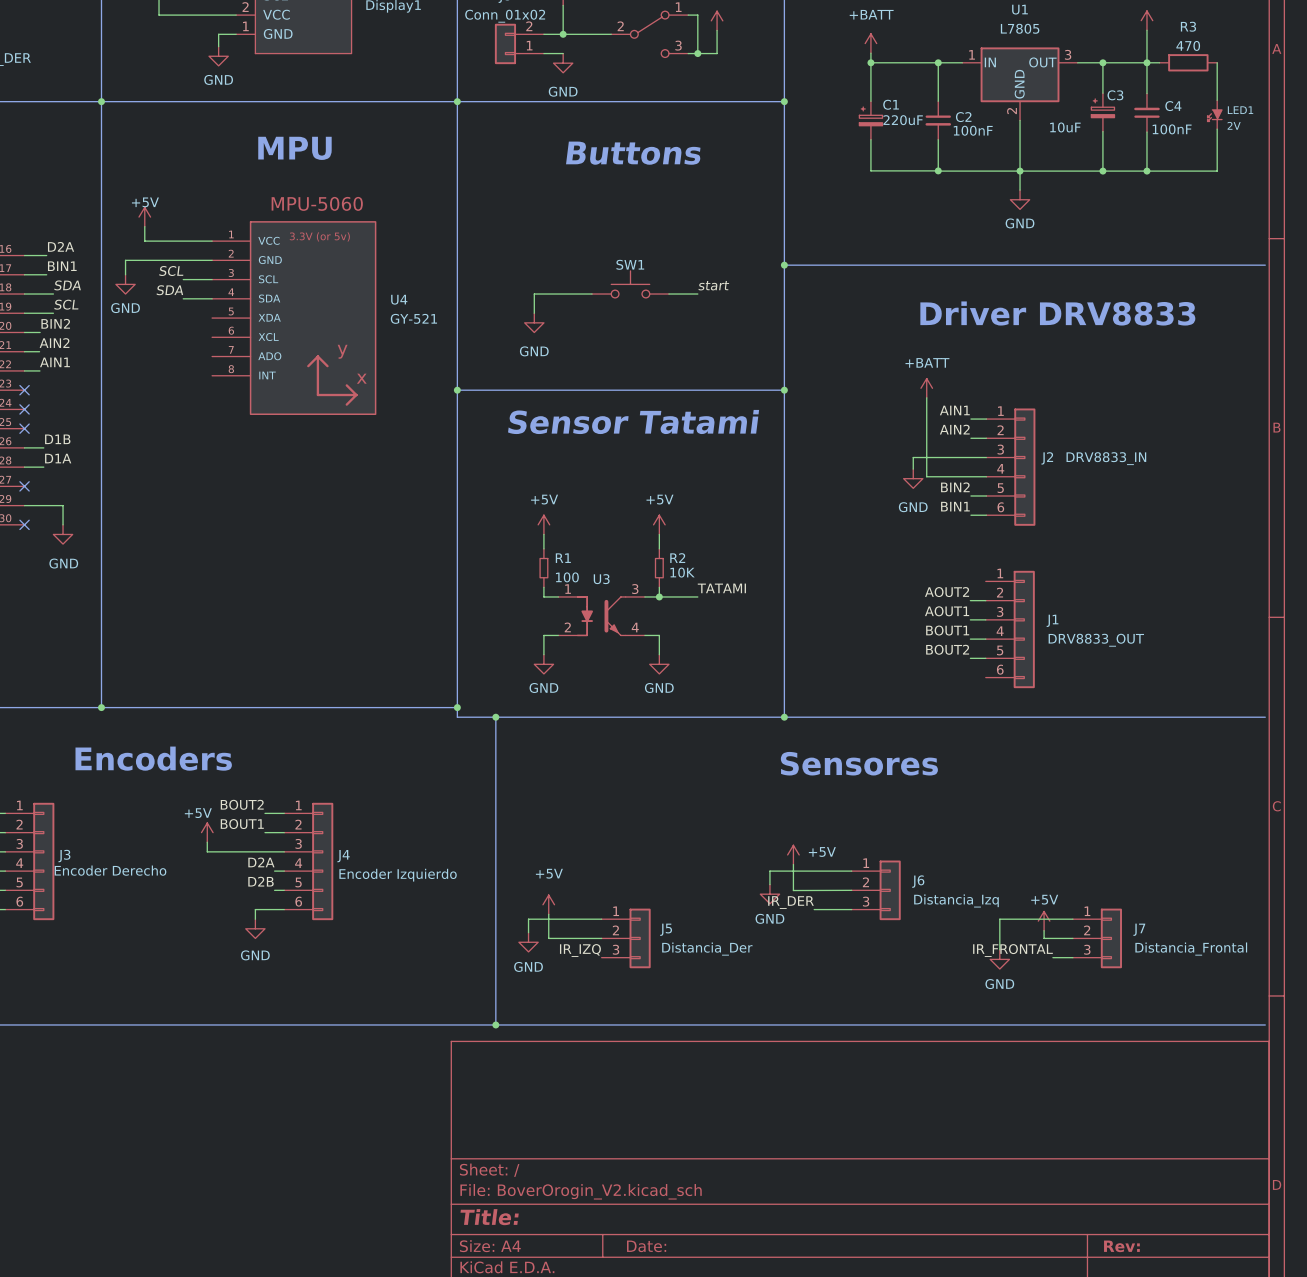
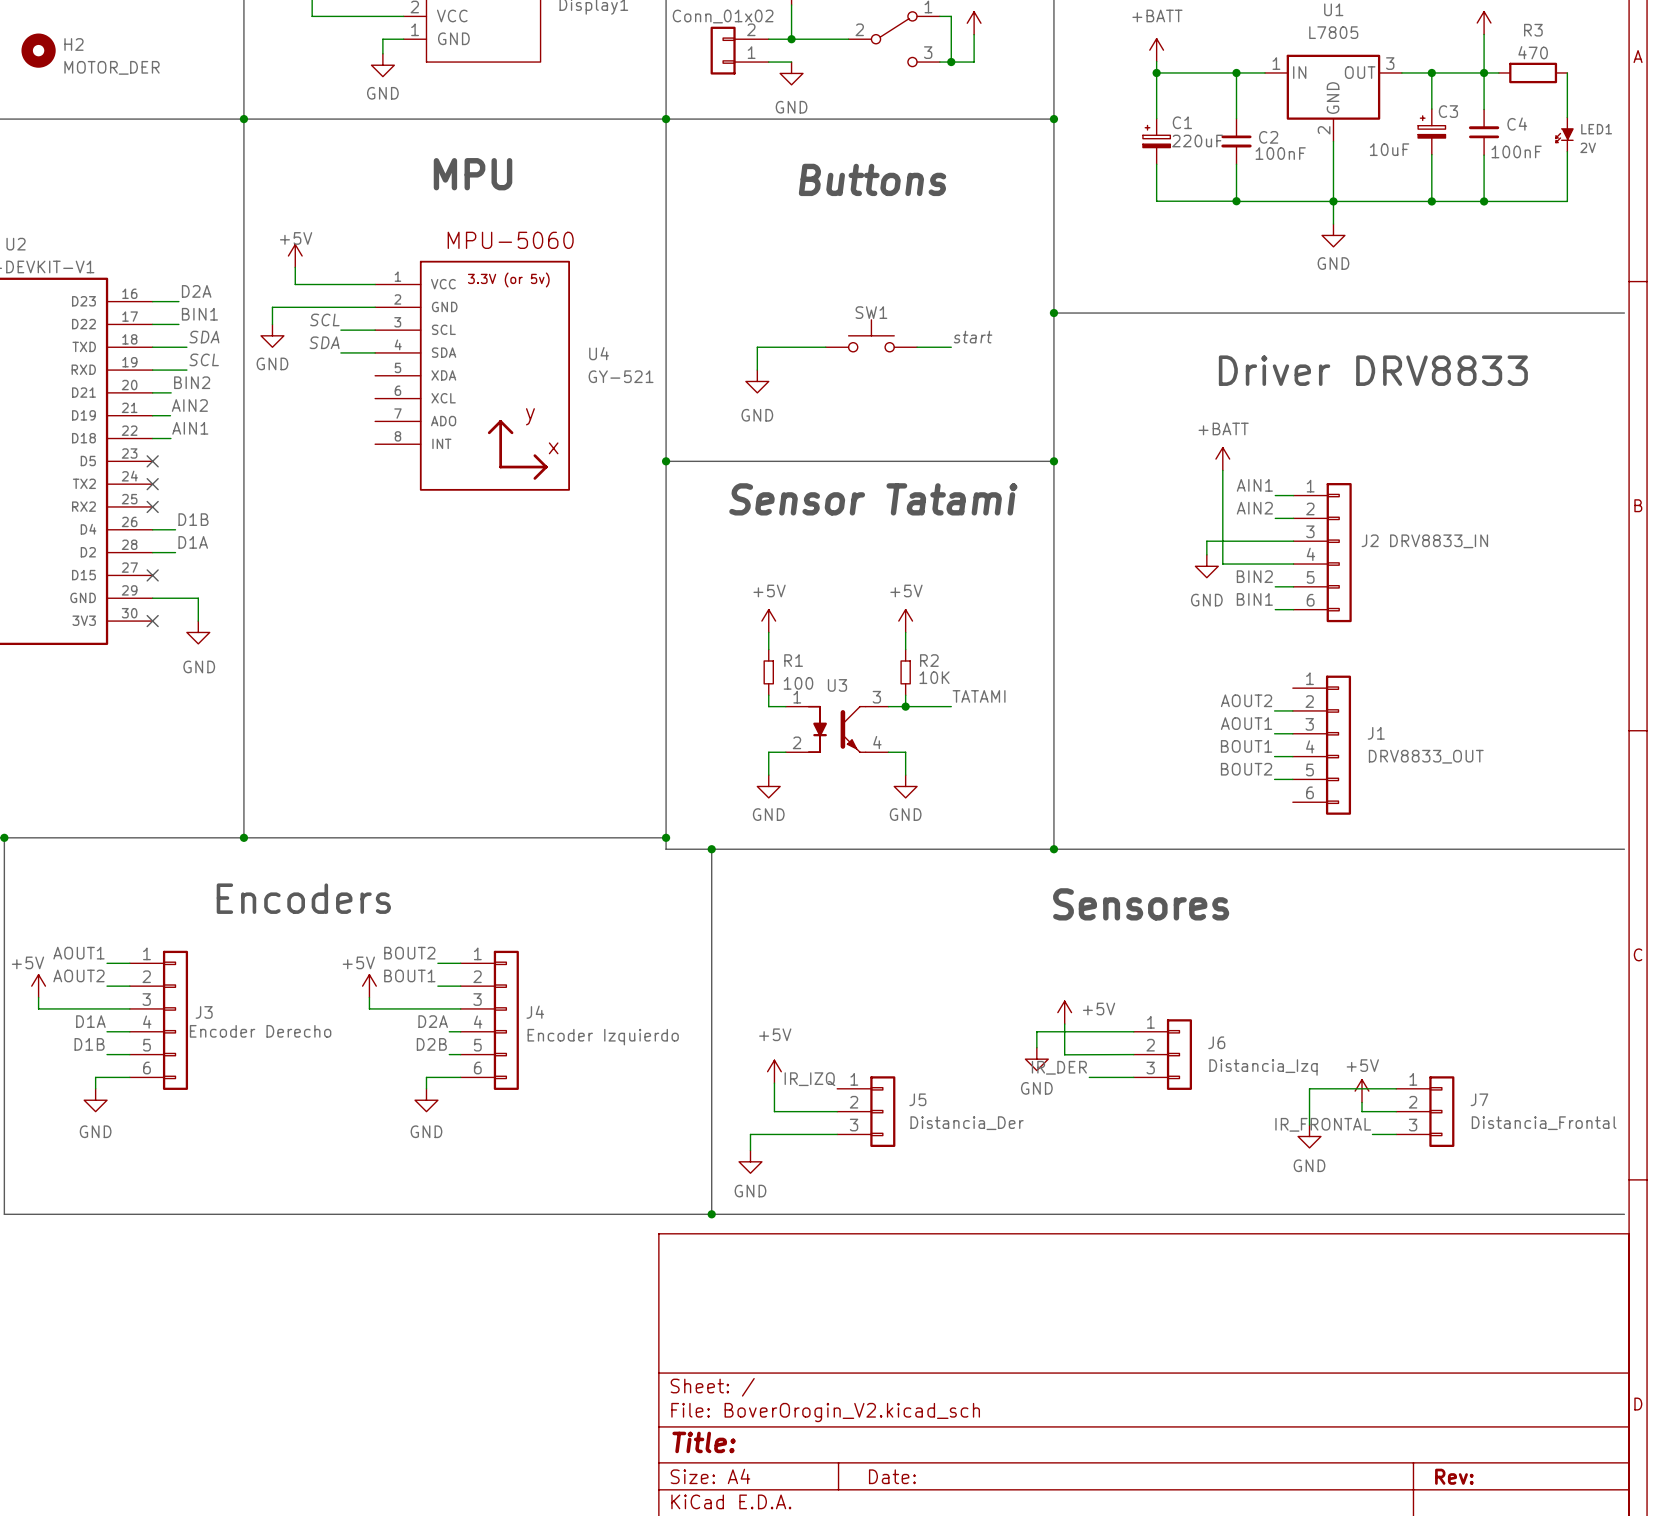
wire: (601, 919) (528, 919) (528, 932) -> (837, 1134) (750, 1134) (750, 1150)
power symbol position: GND (528, 942) -> GND (750, 1161)
label position: IR_IZQ (580, 950) -> IR_IZQ (809, 1079)

